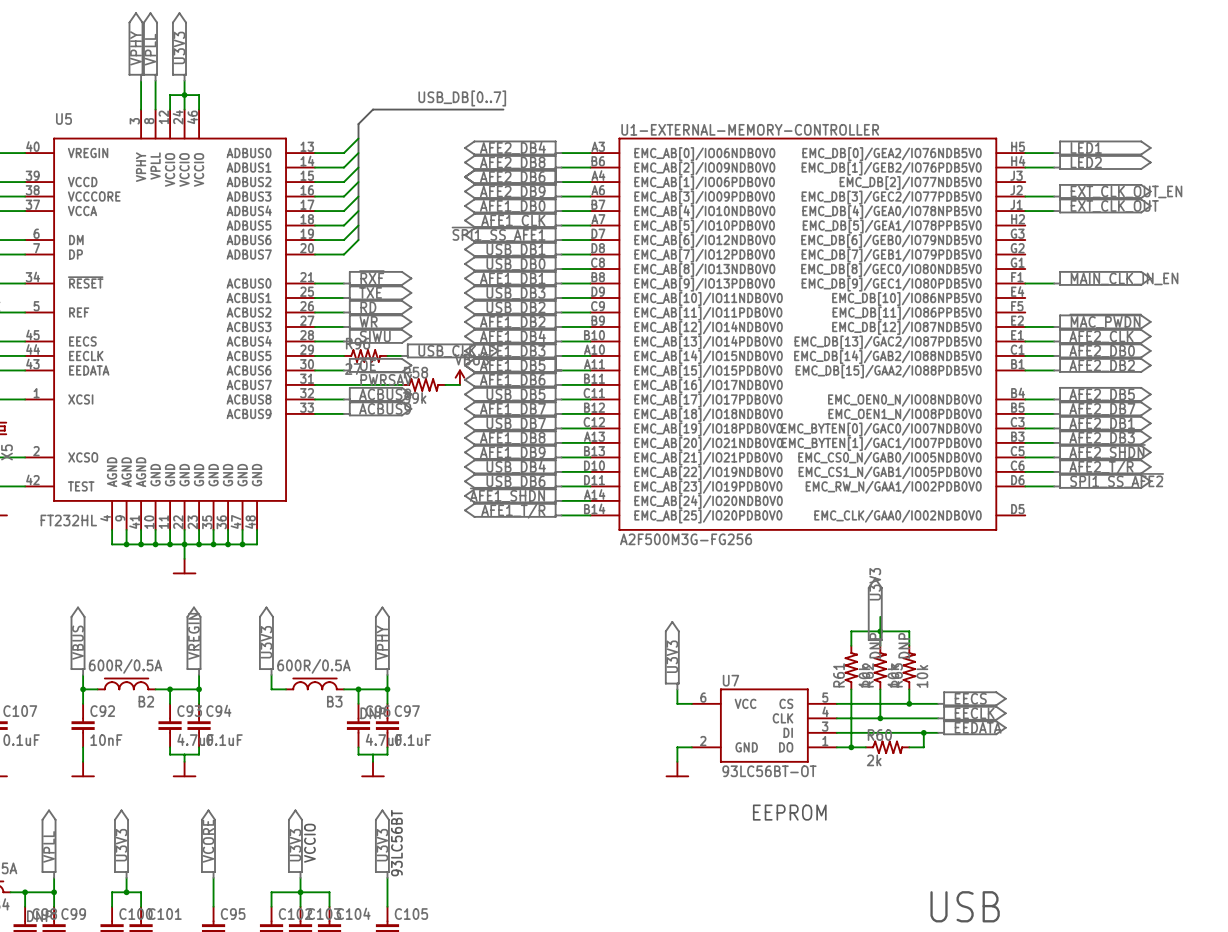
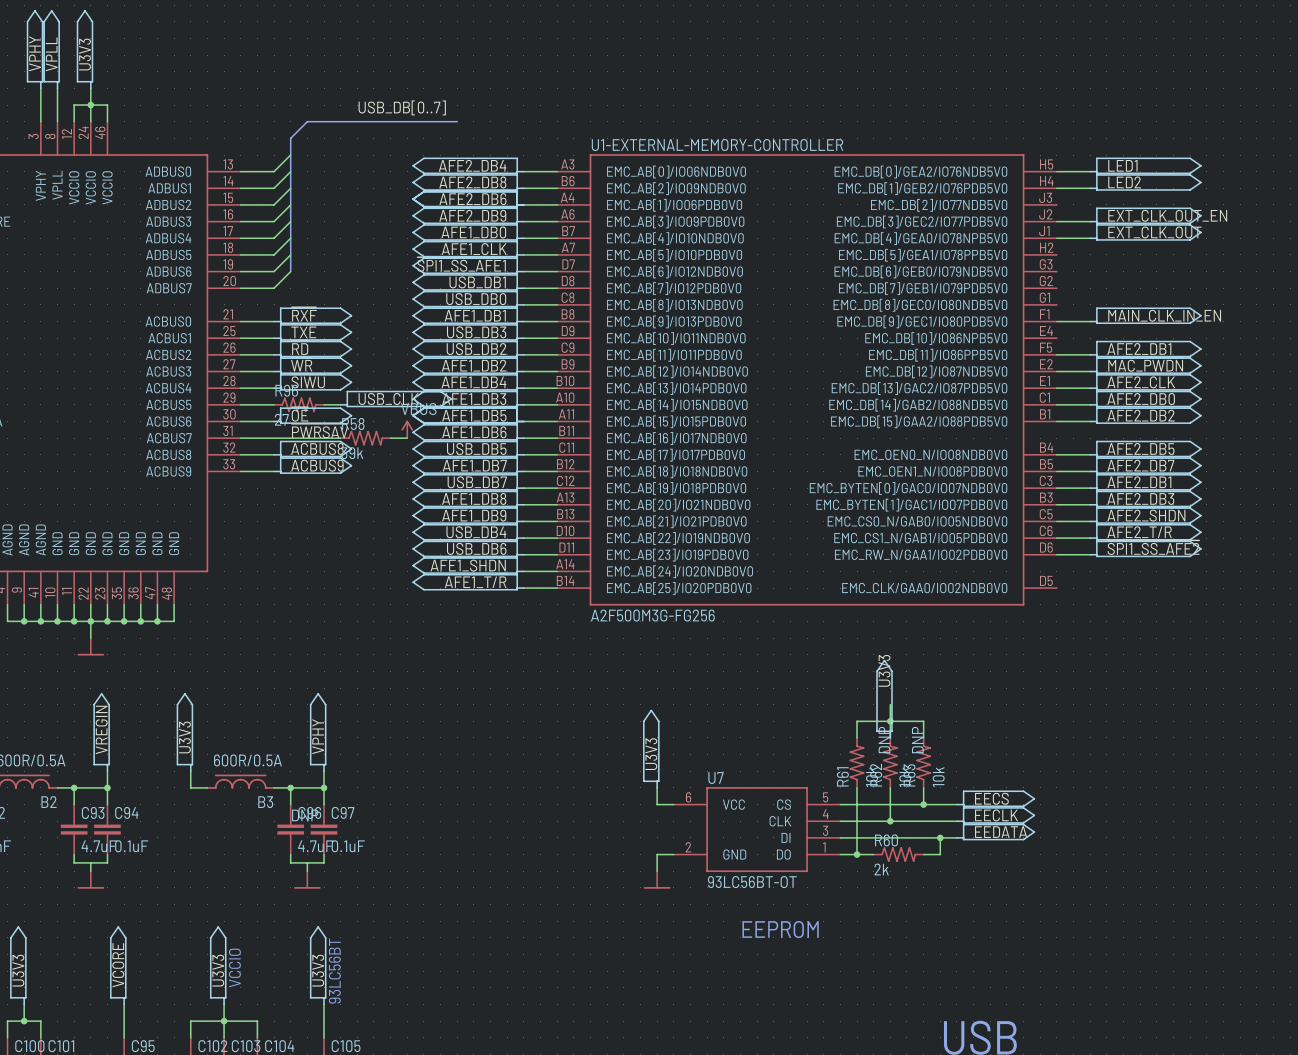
part: none -> (1145, 349)
label: none -> AFE2_DB1 (1139, 348)
wire: none -> (1056, 354) (1090, 354)

